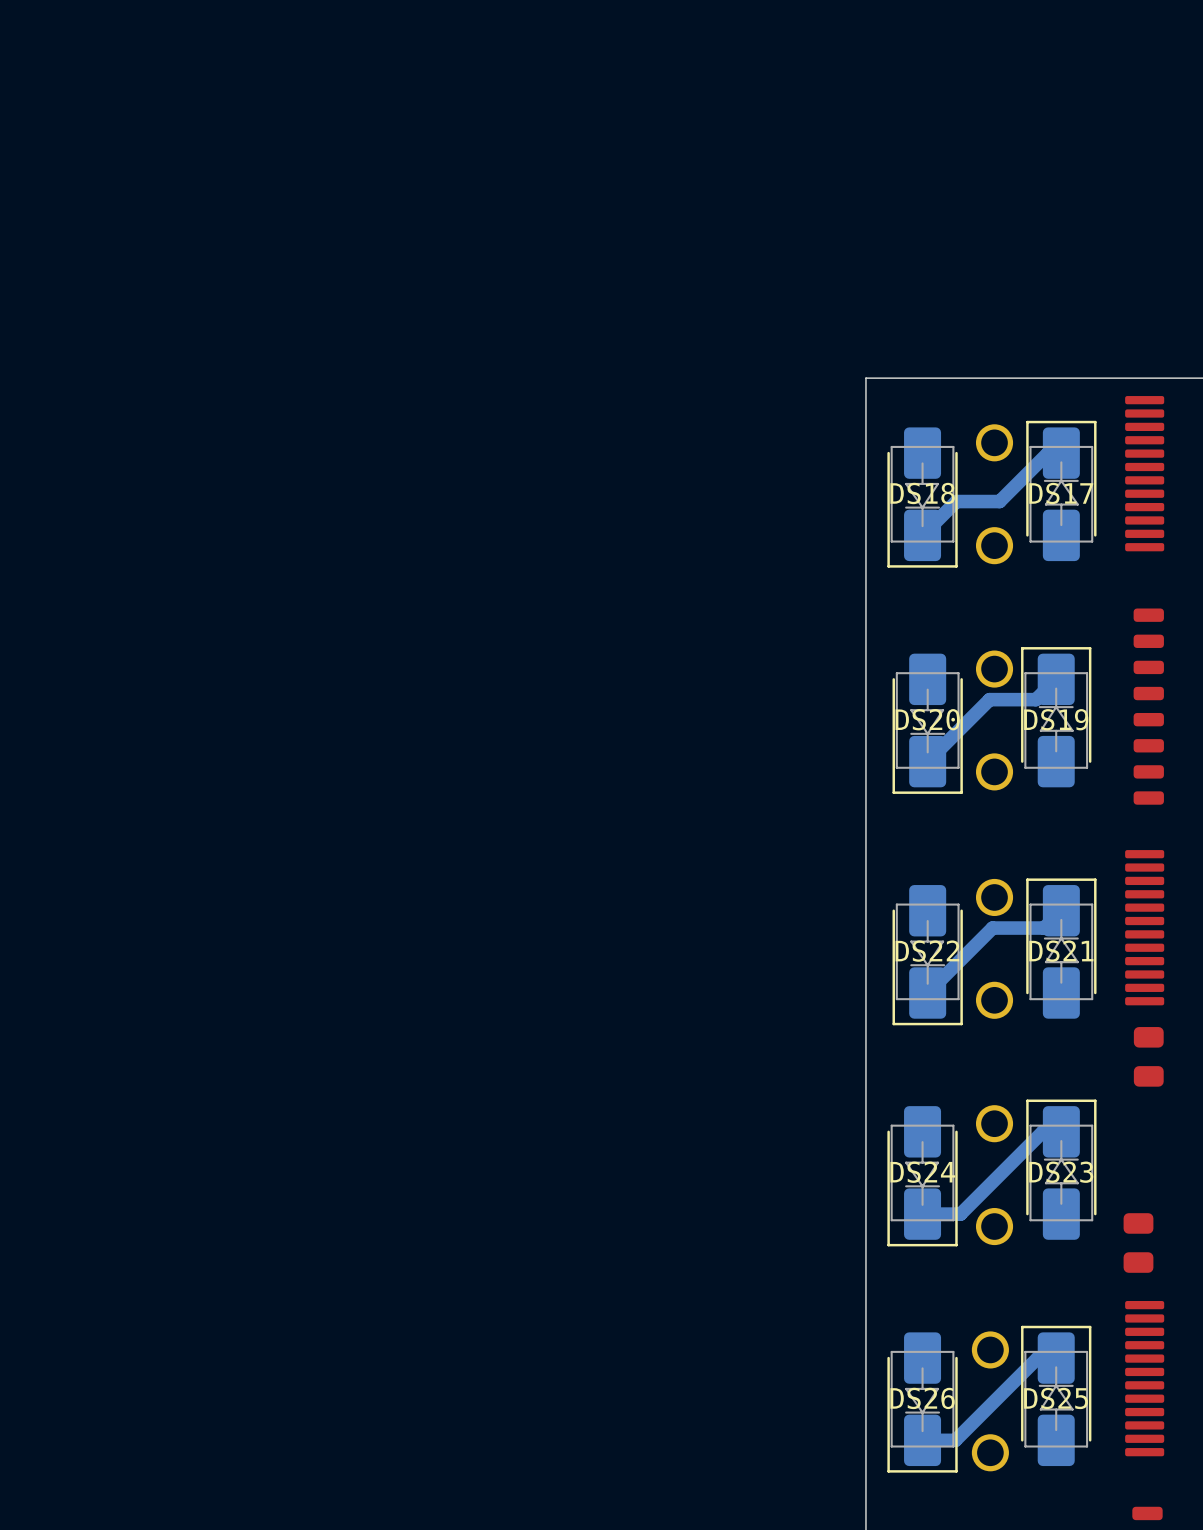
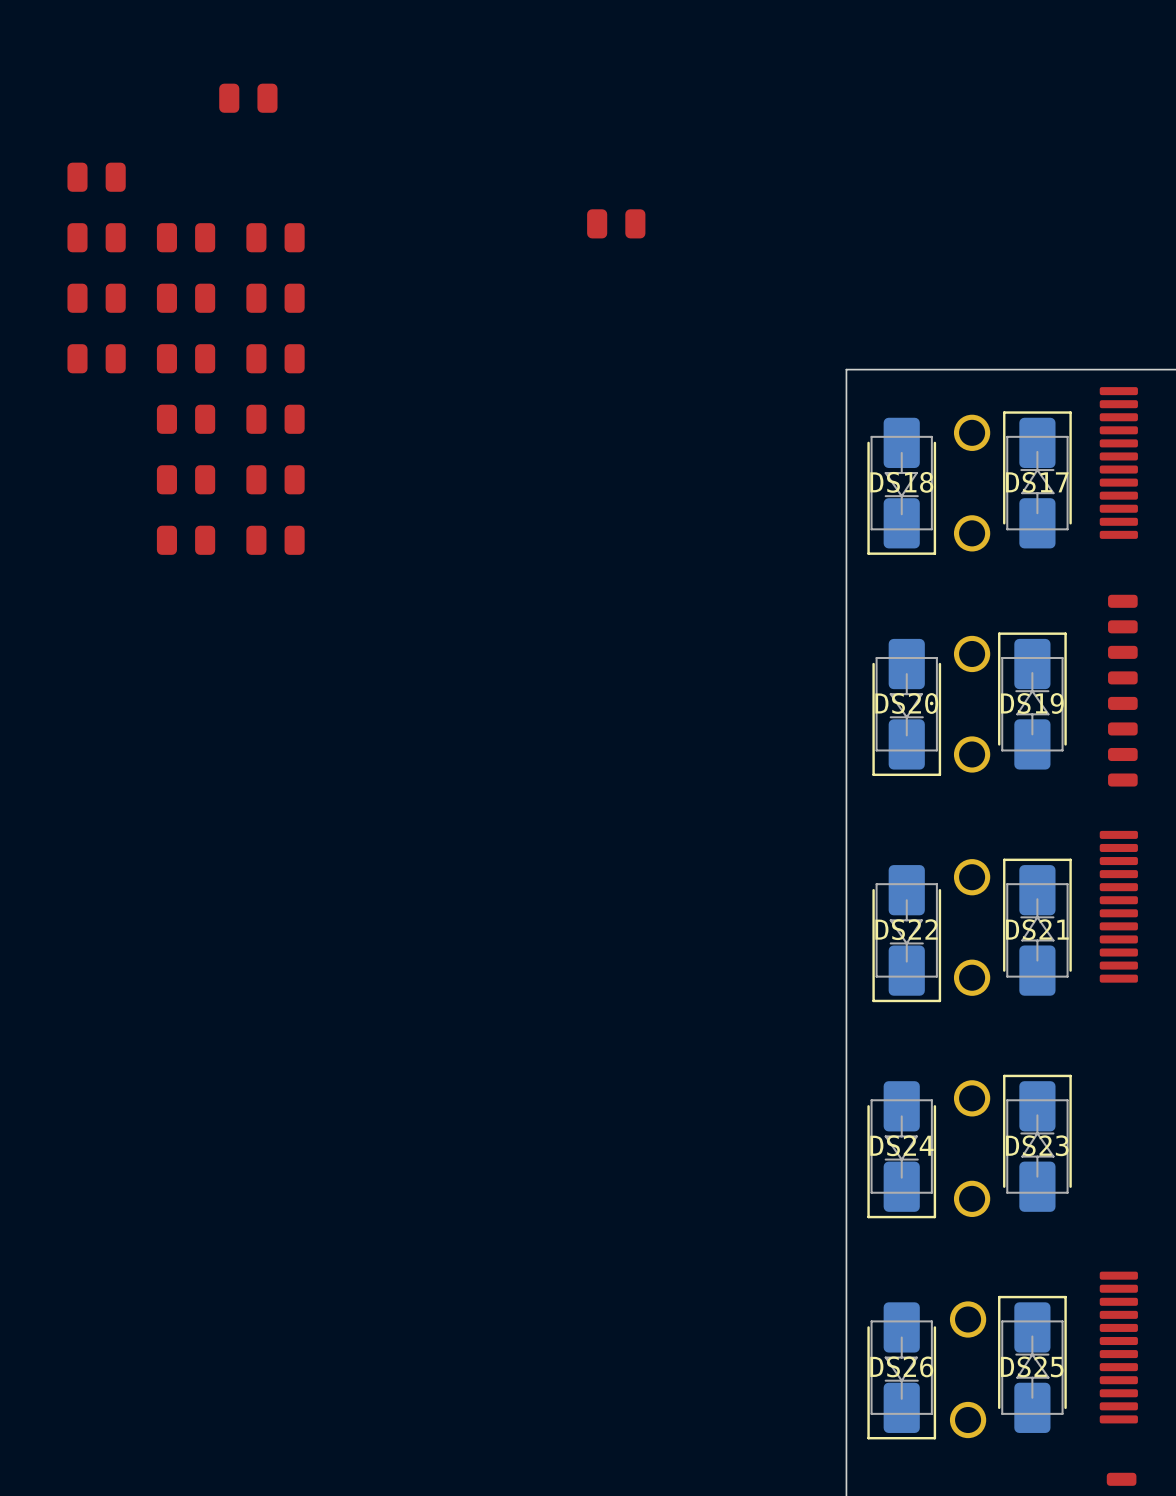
part: none -> (248, 98)
part: none -> (96, 177)
part: none -> (616, 223)
part: none -> (96, 237)
part: none -> (186, 237)
part: none -> (275, 237)
part: none -> (96, 298)
part: none -> (186, 298)
part: none -> (275, 298)
part: none -> (96, 358)
part: none -> (186, 358)
part: none -> (275, 358)
part: none -> (186, 419)
part: none -> (275, 419)
bottom track: (1061, 453) (1048, 453) (999, 501) (956, 501) (922, 535) -> none
part: none -> (186, 479)
part: none -> (275, 479)
part: none -> (186, 540)
part: none -> (275, 540)
bottom track: (1056, 679) (1035, 699) (989, 699) (927, 761) -> none
bottom track: (1061, 910) (1044, 928) (992, 928) (927, 993) -> none
part: (1148, 1056) -> none
bottom track: (1061, 1131) (1042, 1131) (960, 1214) (922, 1214) -> none
part: (1138, 1242) -> none
bottom track: (1056, 1358) (1037, 1358) (955, 1440) (922, 1440) -> none

